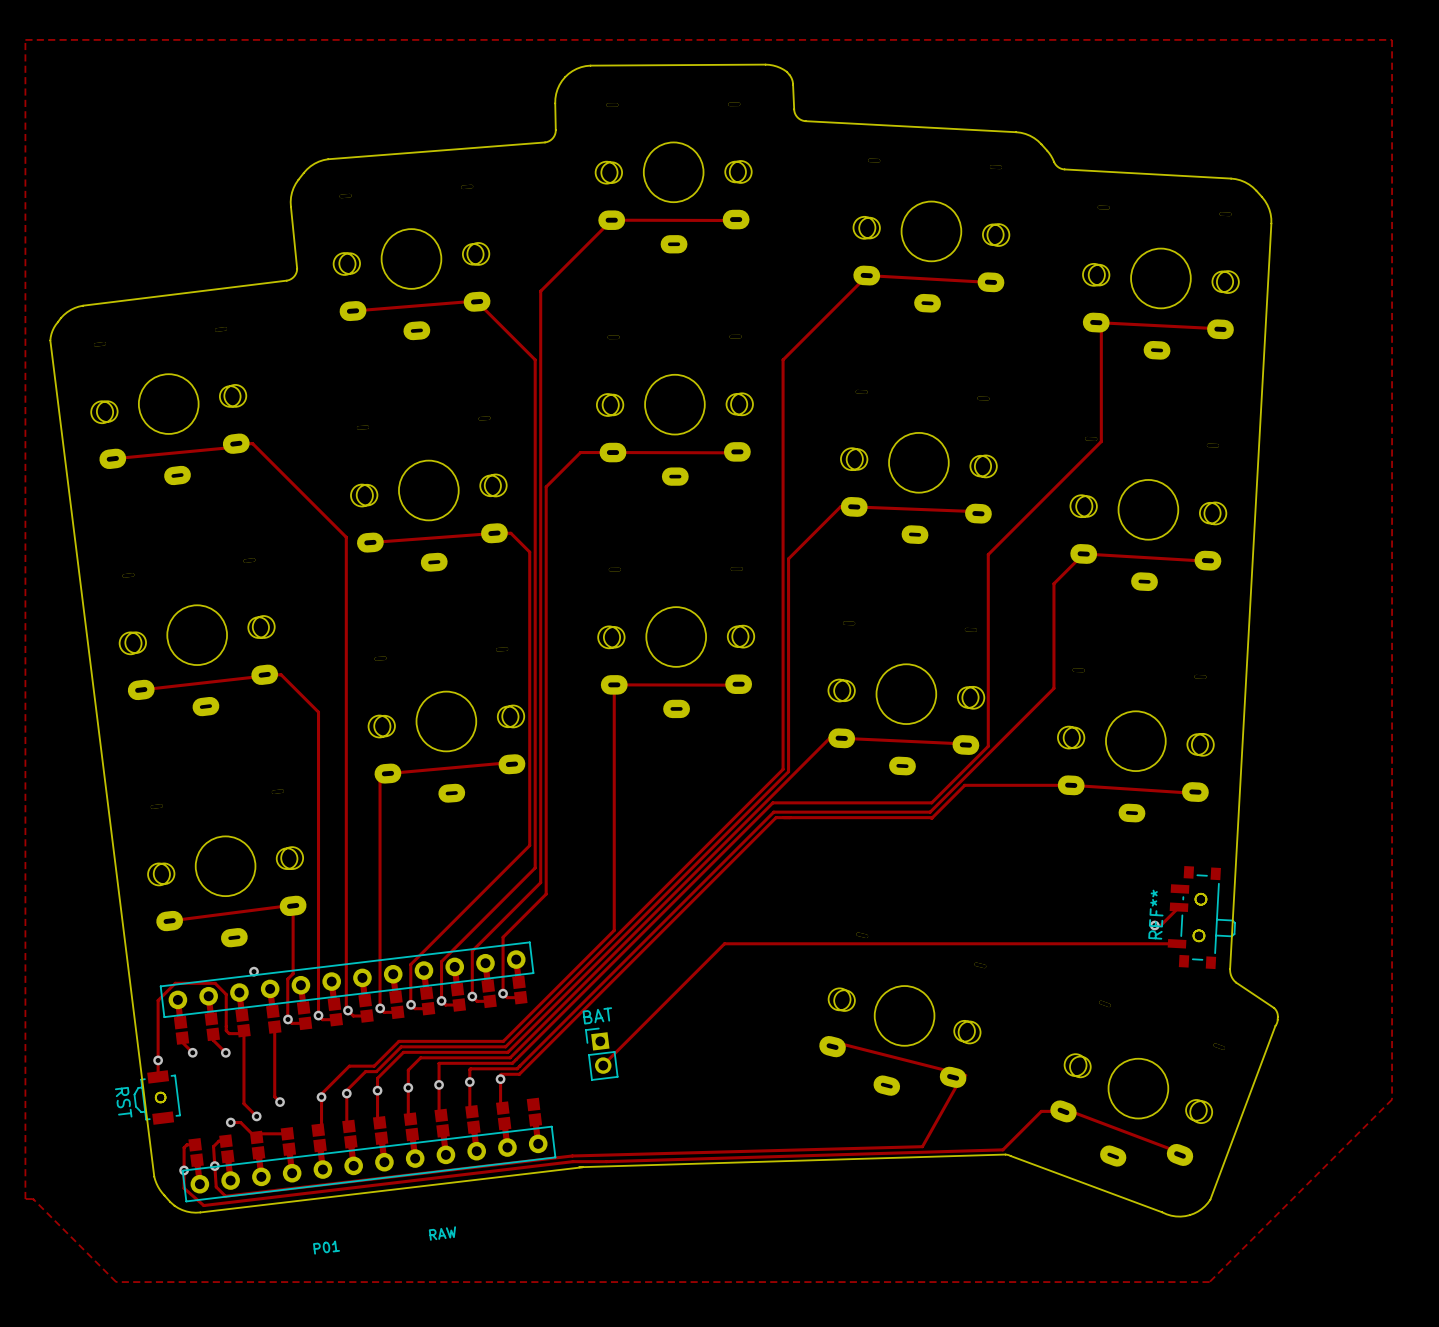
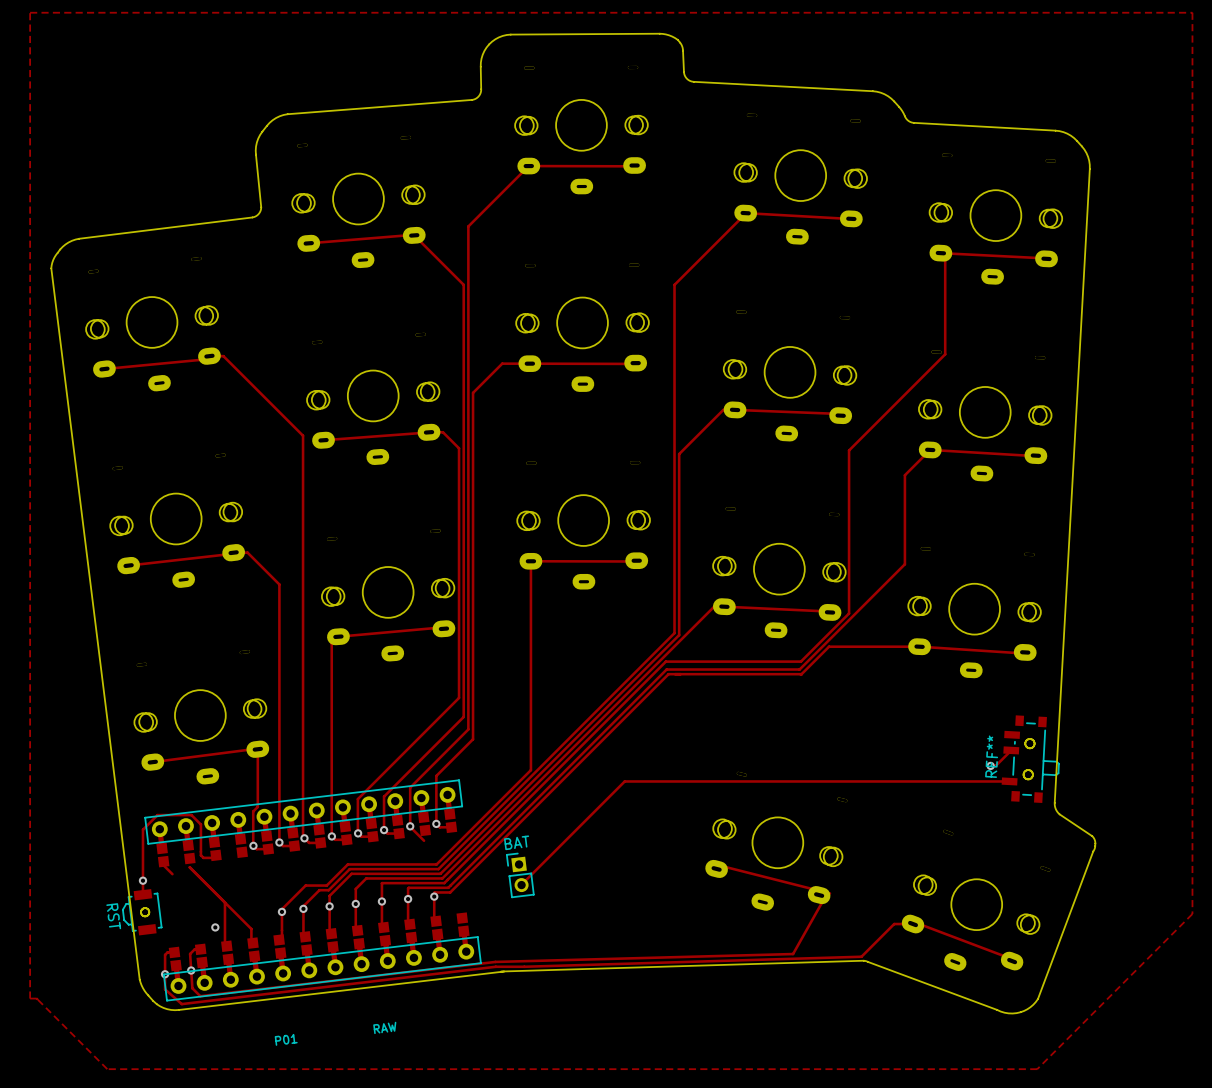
via: (254, 971) -> none
track: (472, 996) (477, 1001) (490, 1001) -> none
track: none -> (410, 826) (424, 840)
track: (274, 1027) (274, 1096) (280, 1102) -> none
track: (243, 1030) (243, 1103) (256, 1116) -> none
track: (213, 1034) (213, 1040) (225, 1052) -> none
track: none -> (189, 867) (251, 929) (251, 938)
via: (192, 1052) -> none
via: (225, 1052) -> none
track: none -> (224, 902) (224, 941)
via: (280, 1102) -> none
via: none -> (215, 927)
via: (256, 1116) -> none
track: (230, 1122) (240, 1122) (256, 1138) (260, 1133) (287, 1133) -> none
via: (230, 1122) -> none

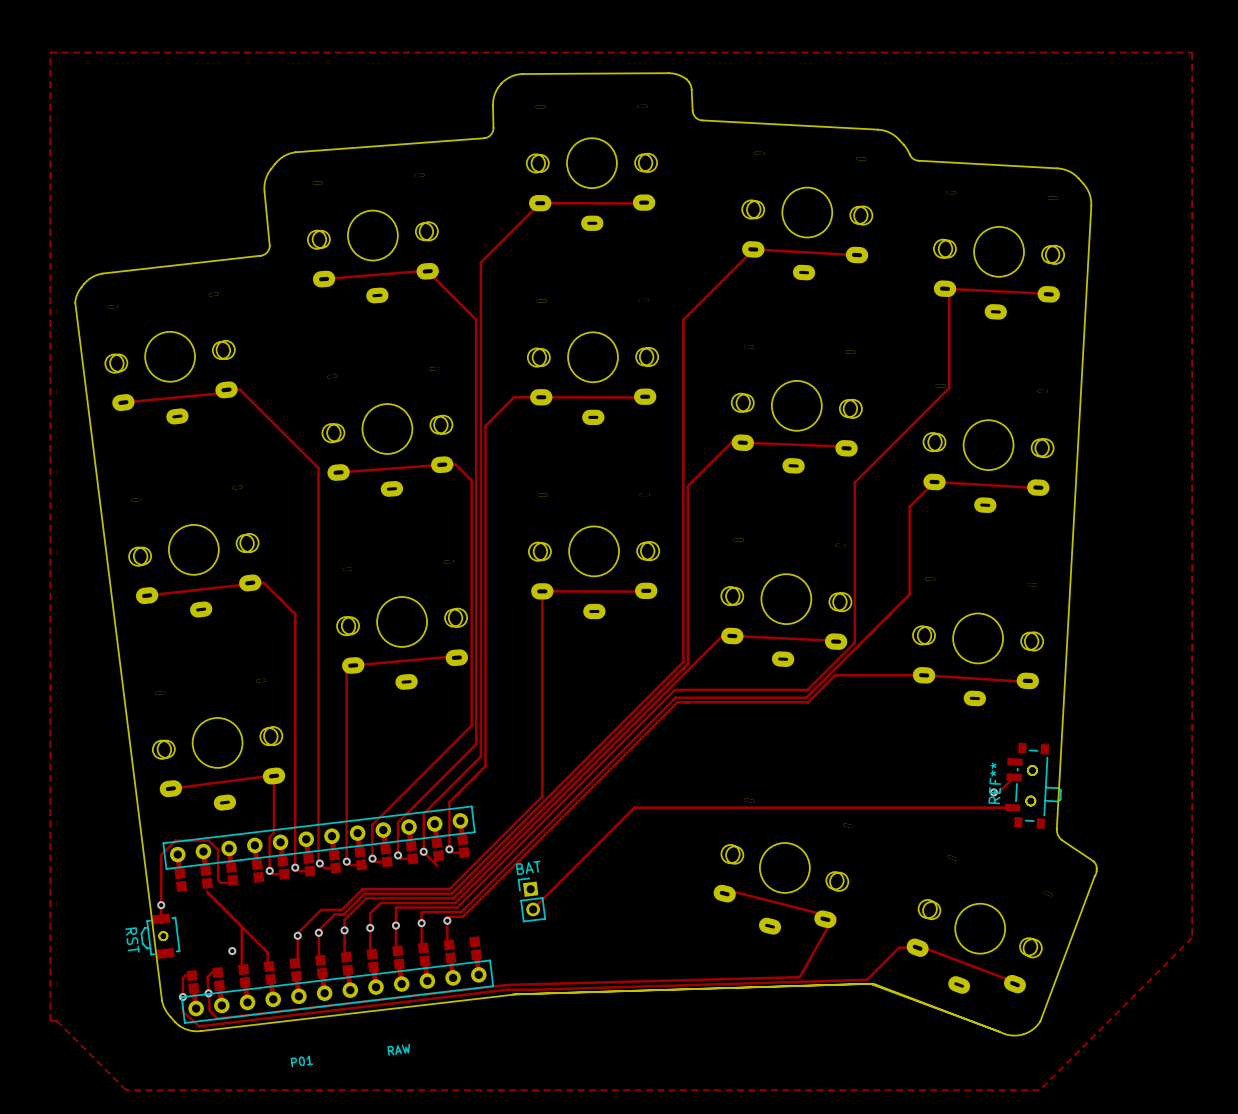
board edge: (472, 99) (279, 116) (266, 125) (256, 142) (255, 154) (261, 207) (256, 215) (75, 239) (60, 249) (53, 260) (51, 268) (139, 979) (144, 990) (156, 1004) (175, 1010) (504, 971) -> (484, 138) (287, 154) (275, 163) (265, 180) (264, 191) (269, 245) (265, 253) (102, 273) (89, 279) (77, 294) (75, 302) (162, 1001) (165, 1009) (178, 1025) (196, 1031) (516, 994) (872, 983) (1000, 1032)
track: (163, 861) (163, 865) (172, 874) -> none

